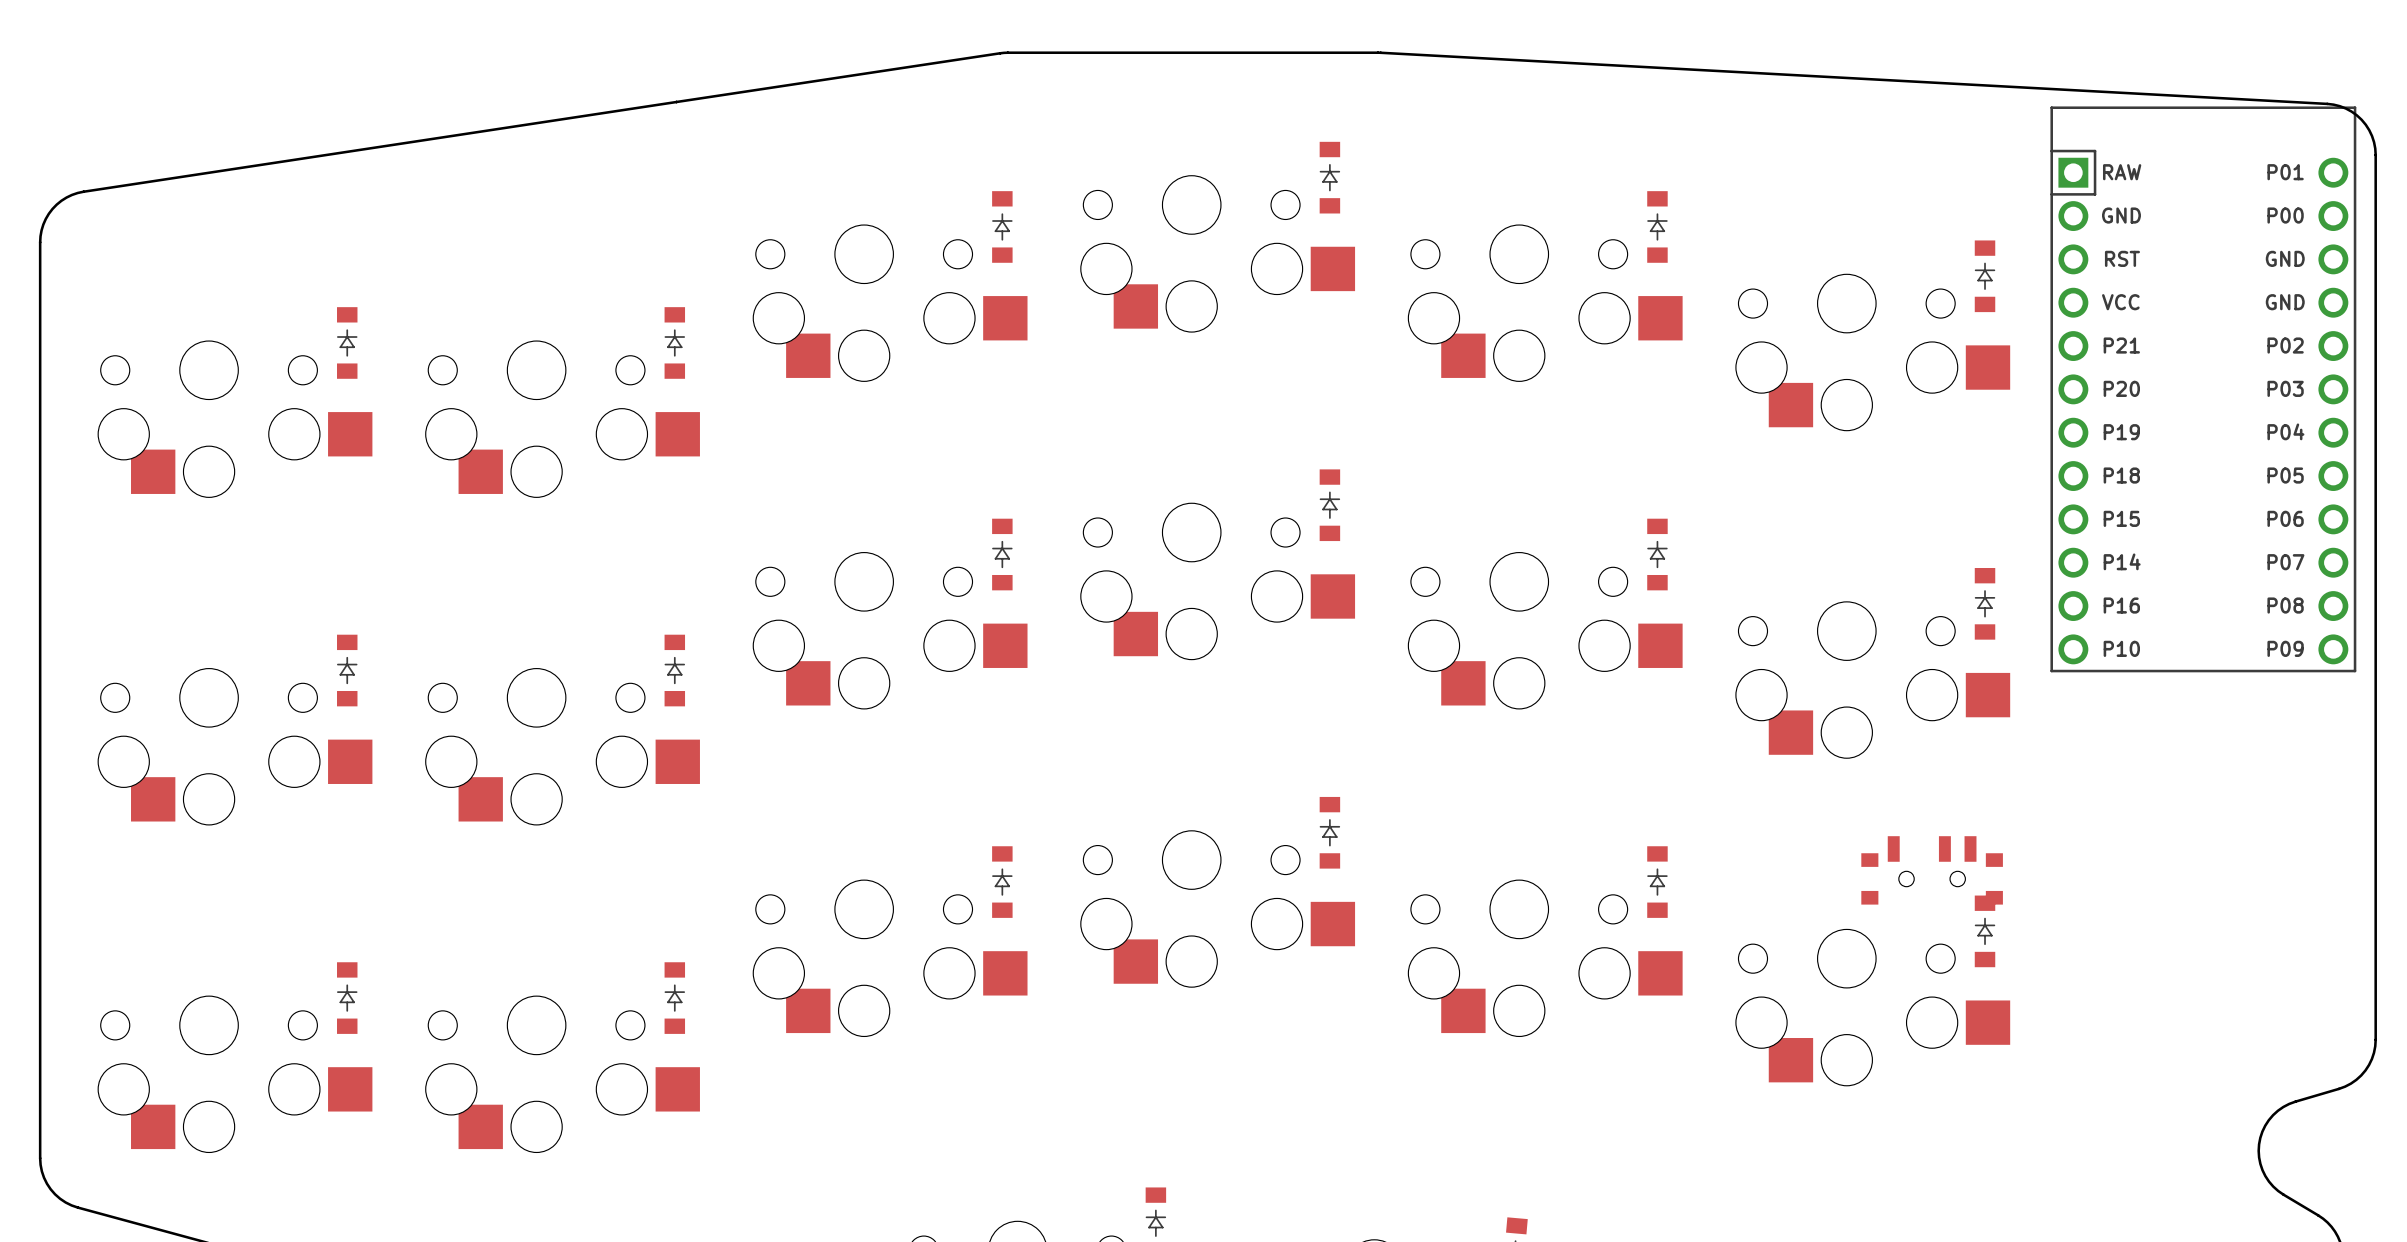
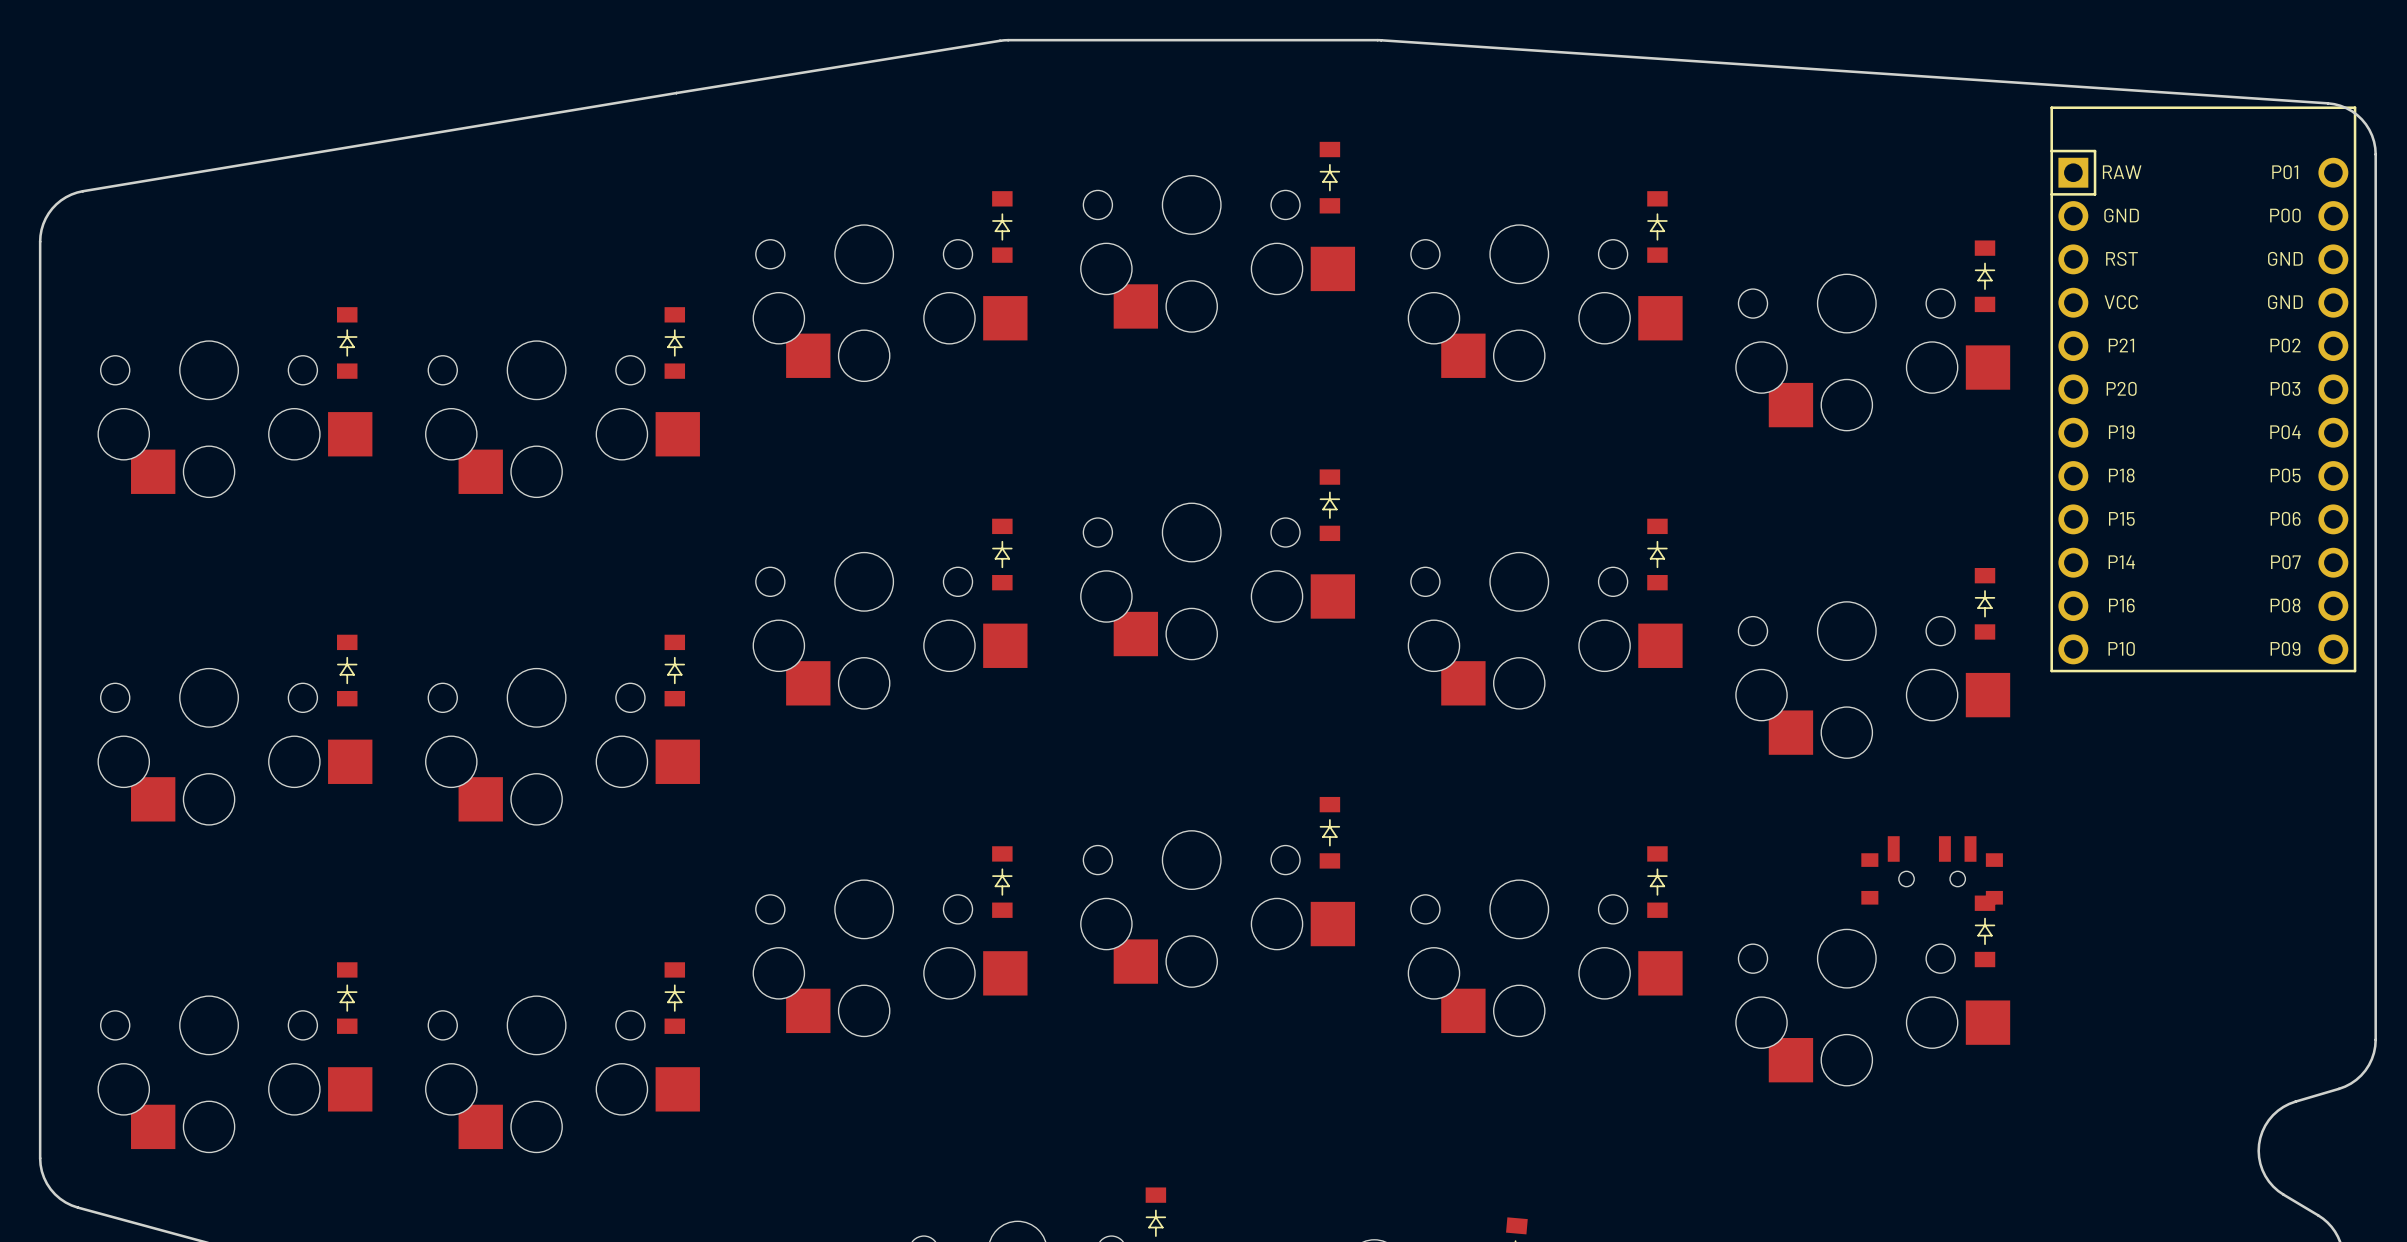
board edge: (2375, 155) (2372, 136) (2361, 119) (2345, 108) (2327, 103) (1379, 52) (1004, 52) (83, 191) (66, 197) (52, 208) (43, 224) (40, 242) -> (2375, 155) (2372, 135) (2361, 119) (2346, 108) (2327, 103) (1379, 40) (1008, 40) (82, 191) (66, 197) (52, 208) (43, 224) (40, 242)

